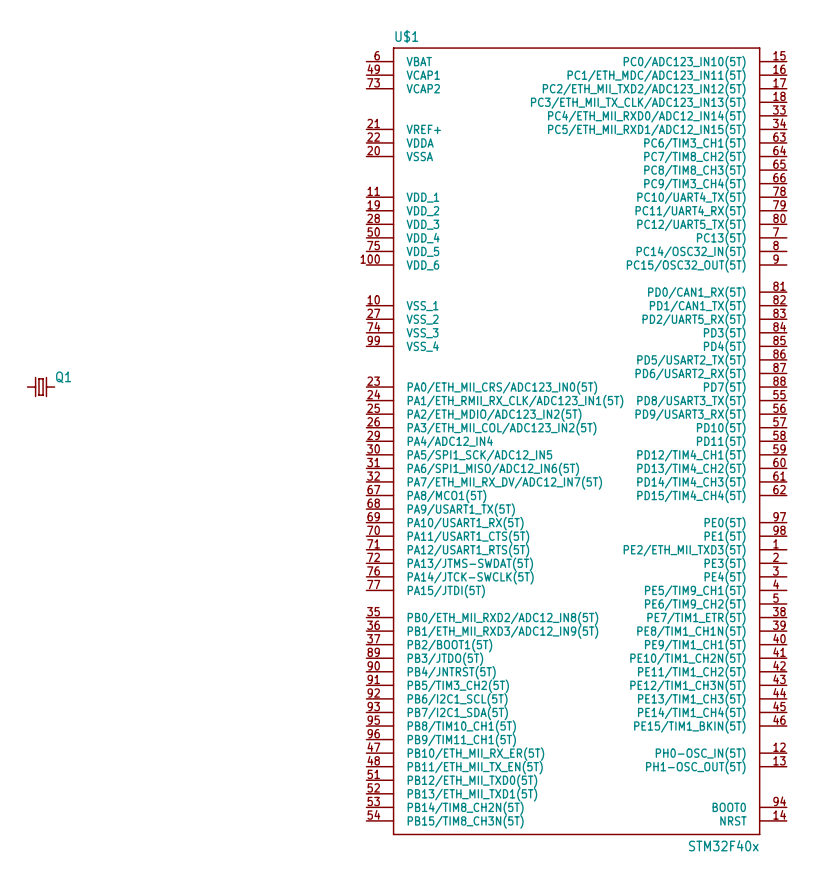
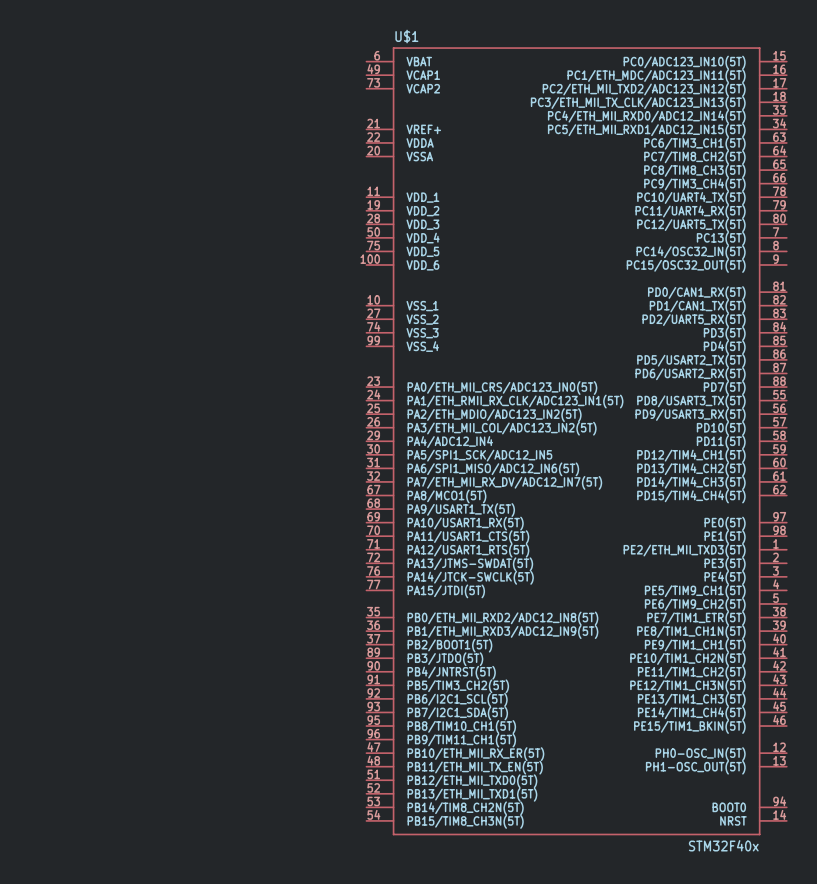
Q1: (41, 387) -> none

